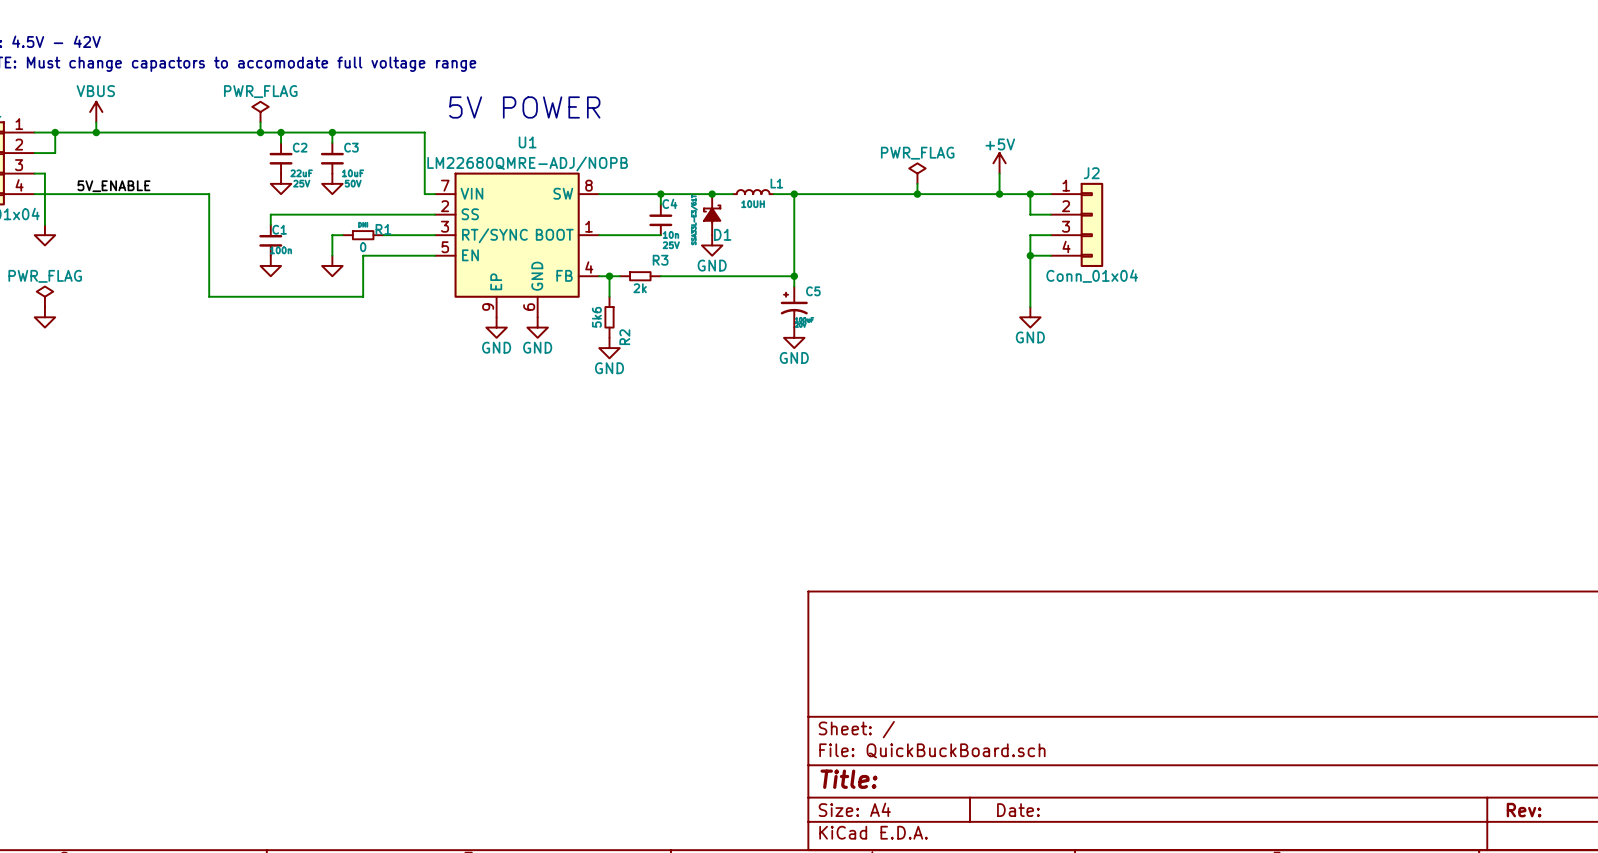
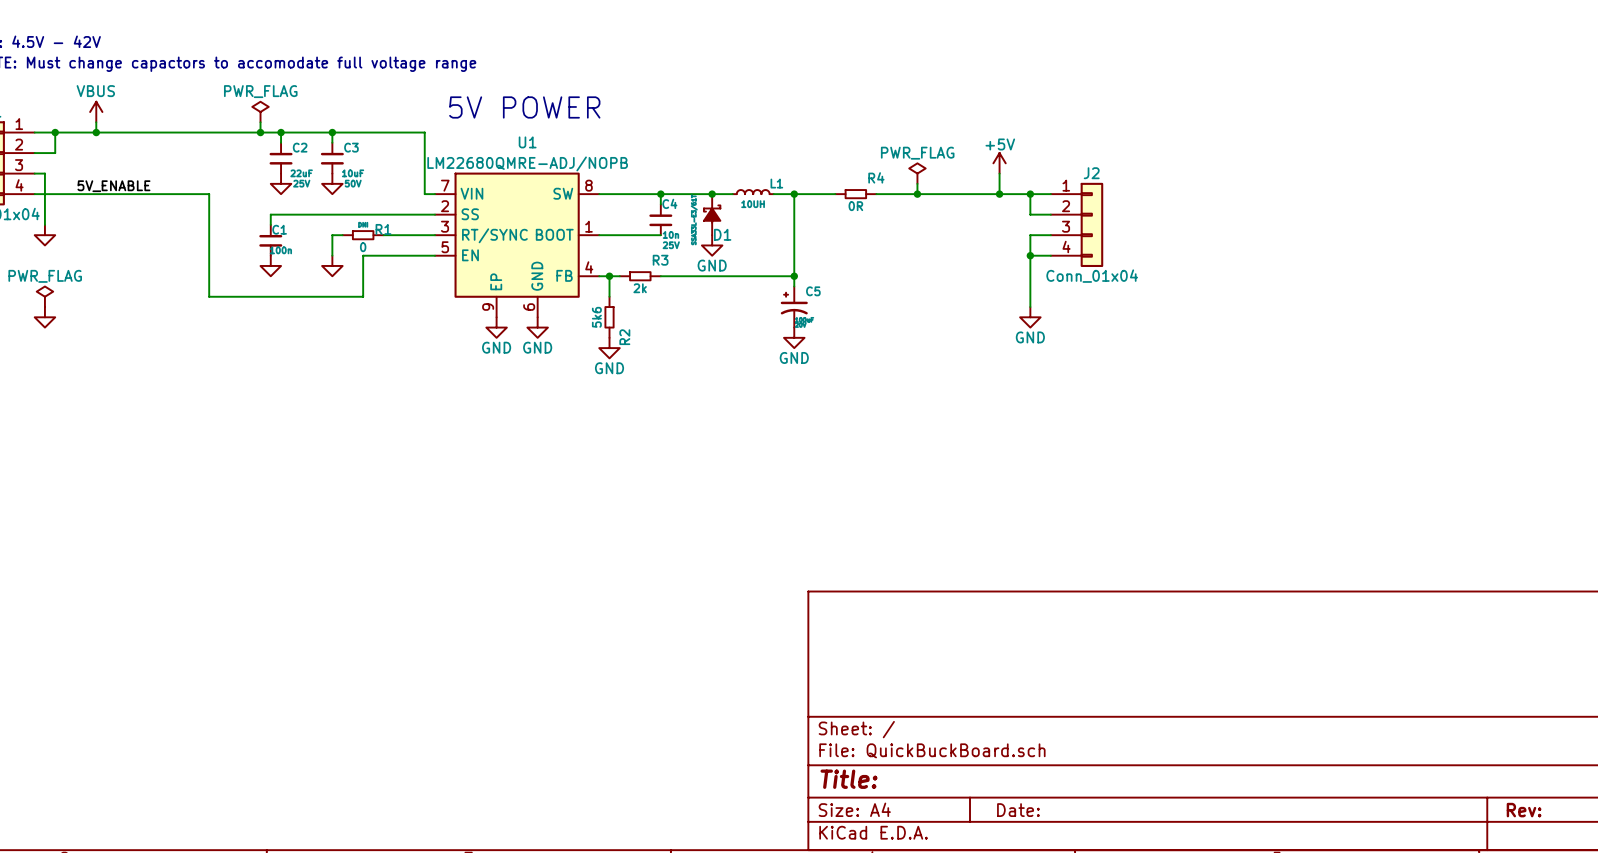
R4: none -> (855, 194)

